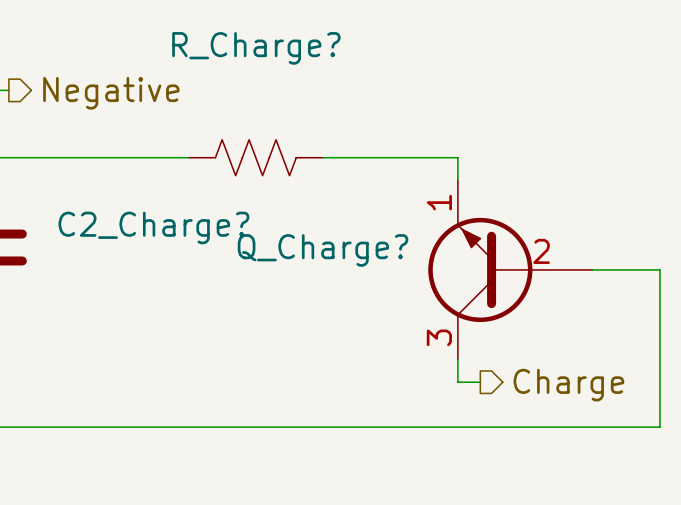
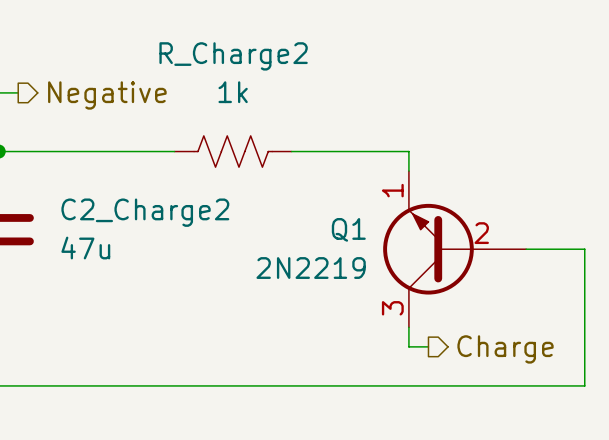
R_Charge? name: R_Charge? (256, 48) -> R_Charge2 (233, 56)
R_Charge? value: none -> 1k (233, 92)
C2_Charge? name: C2_Charge? (153, 227) -> C2_Charge2 (145, 212)
Q_Charge? name: Q_Charge? (323, 250) -> Q1 (348, 229)
C2_Charge? value: none -> 47u (85, 248)
Q_Charge? value: none -> 2N2219 (311, 268)

